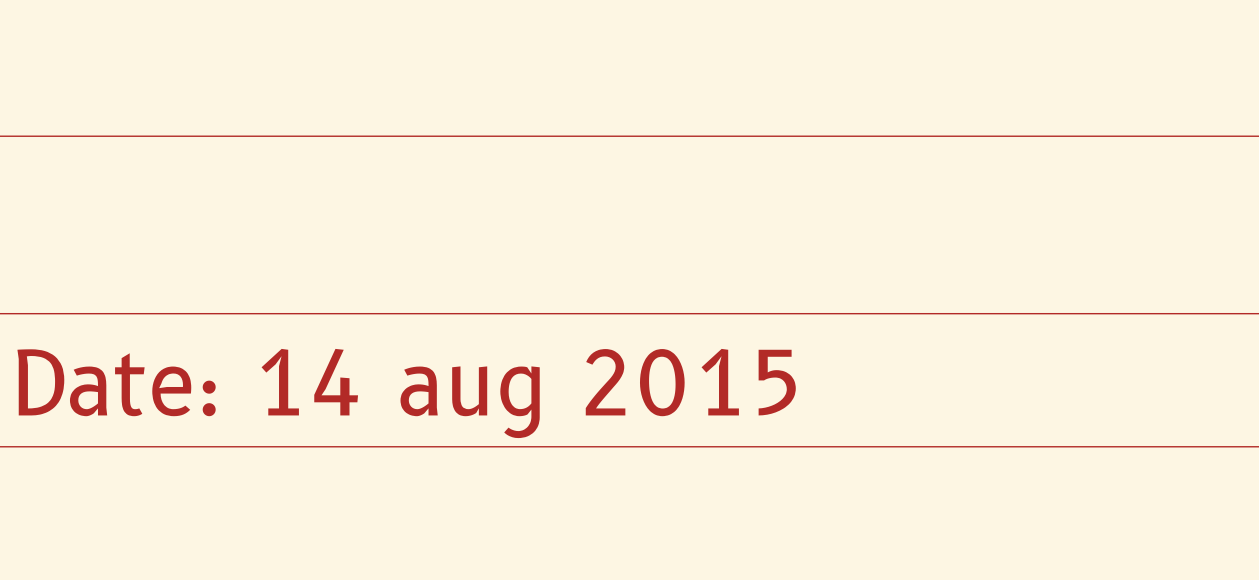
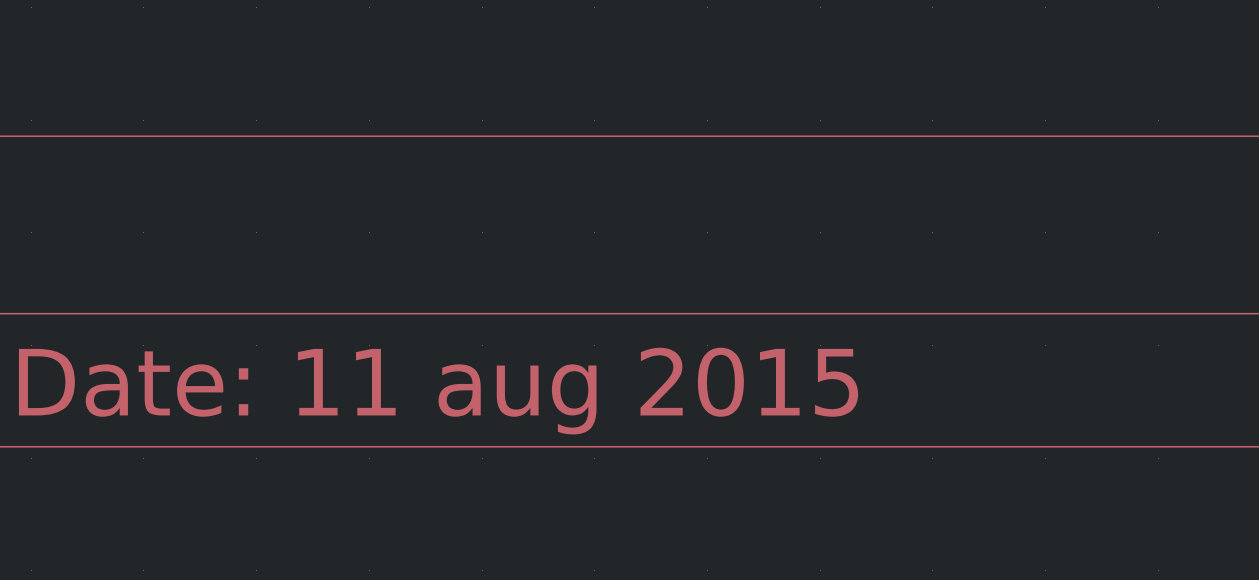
title block: Date: 14 aug 2015 (406, 393) -> Date: 11 aug 2015 (438, 391)

